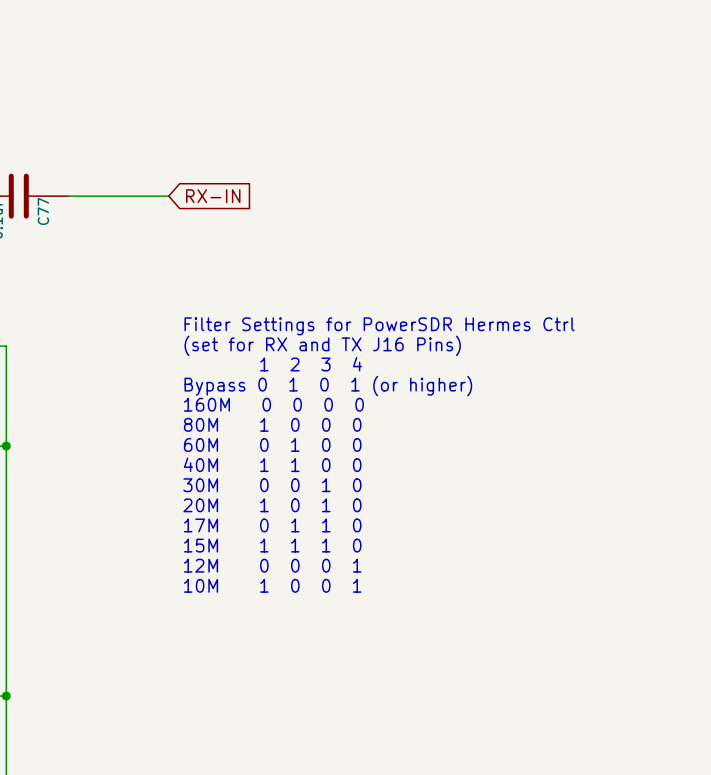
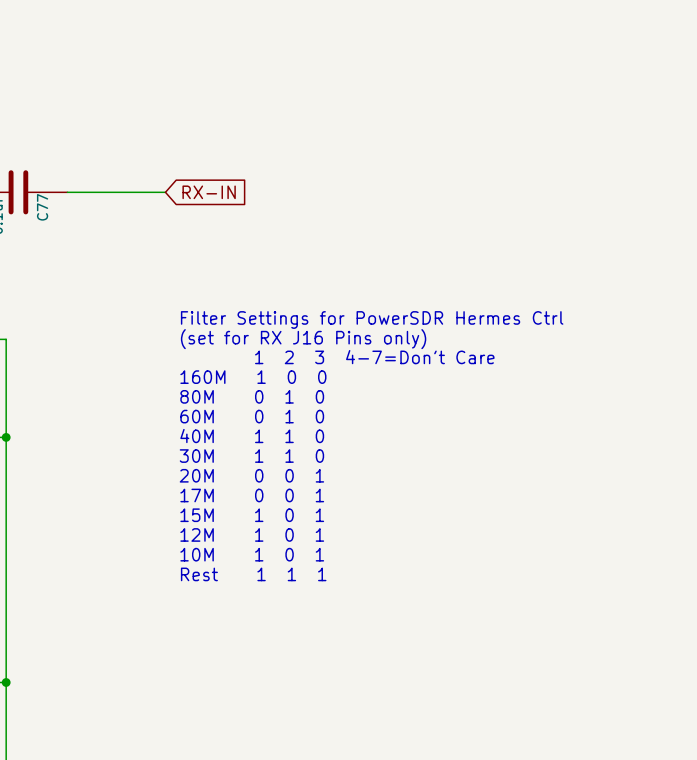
text: (set for RX and TX J16 Pins) (322, 345) -> (set for RX J16 Pins only) (303, 339)
text: 1 2 3 4 (311, 364) -> 1 2 3 4-7=Don't Care (374, 357)
text: Bypass 0 1 0 1 (or higher) (328, 386) -> 160M 1 0 0 (253, 377)
text: 160M 0 0 0 0 (273, 404) -> 80M 0 1 0 (252, 396)
text: 80M 1 0 0 0 (272, 424) -> 60M 0 1 0 (252, 416)
text: 60M 0 1 0 0 (272, 444) -> 40M 1 1 0 (252, 436)
text: 40M 1 1 0 0 (272, 464) -> 30M 1 1 0 (251, 456)
text: 30M 0 0 1 0 (272, 485) -> 20M 0 0 1 (251, 475)
text: 20M 1 0 1 0 (272, 505) -> 17M 0 0 1 (252, 495)
text: 17M 0 1 1 0 (272, 525) -> 15M 1 0 1 (252, 515)
text: 15M 1 1 1 0 (272, 545) -> 12M 1 0 1 (252, 534)
text: 12M 0 0 0 1 (272, 565) -> 10M 1 0 1 (252, 554)
text: 10M 1 0 0 1 (272, 585) -> Rest 1 1 1 (253, 574)

